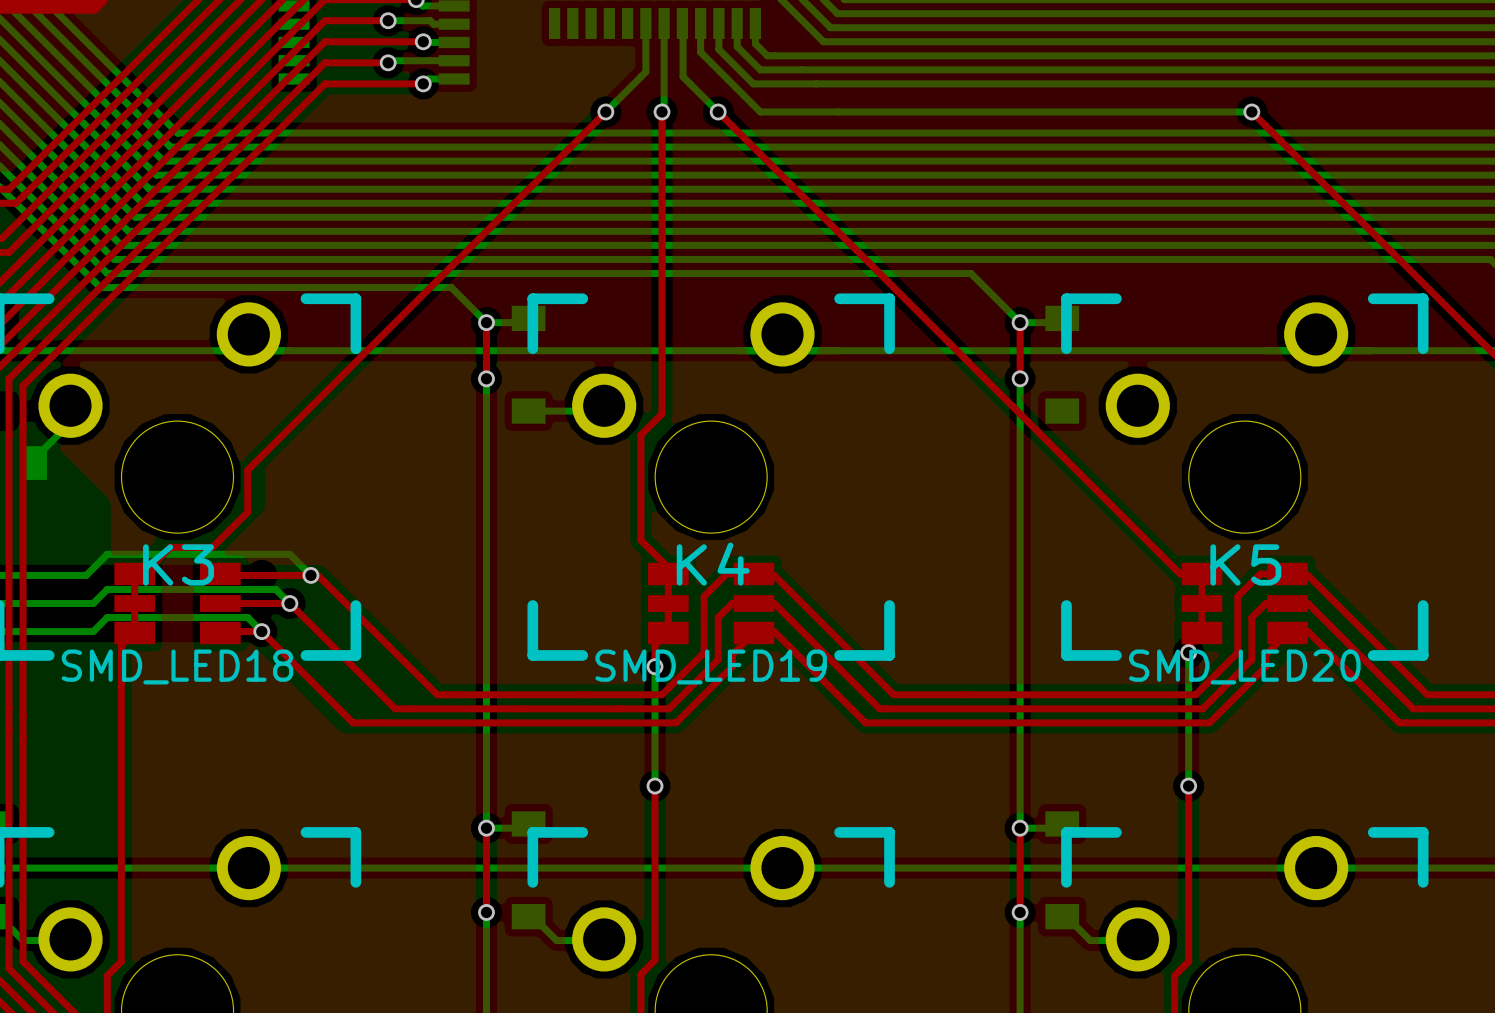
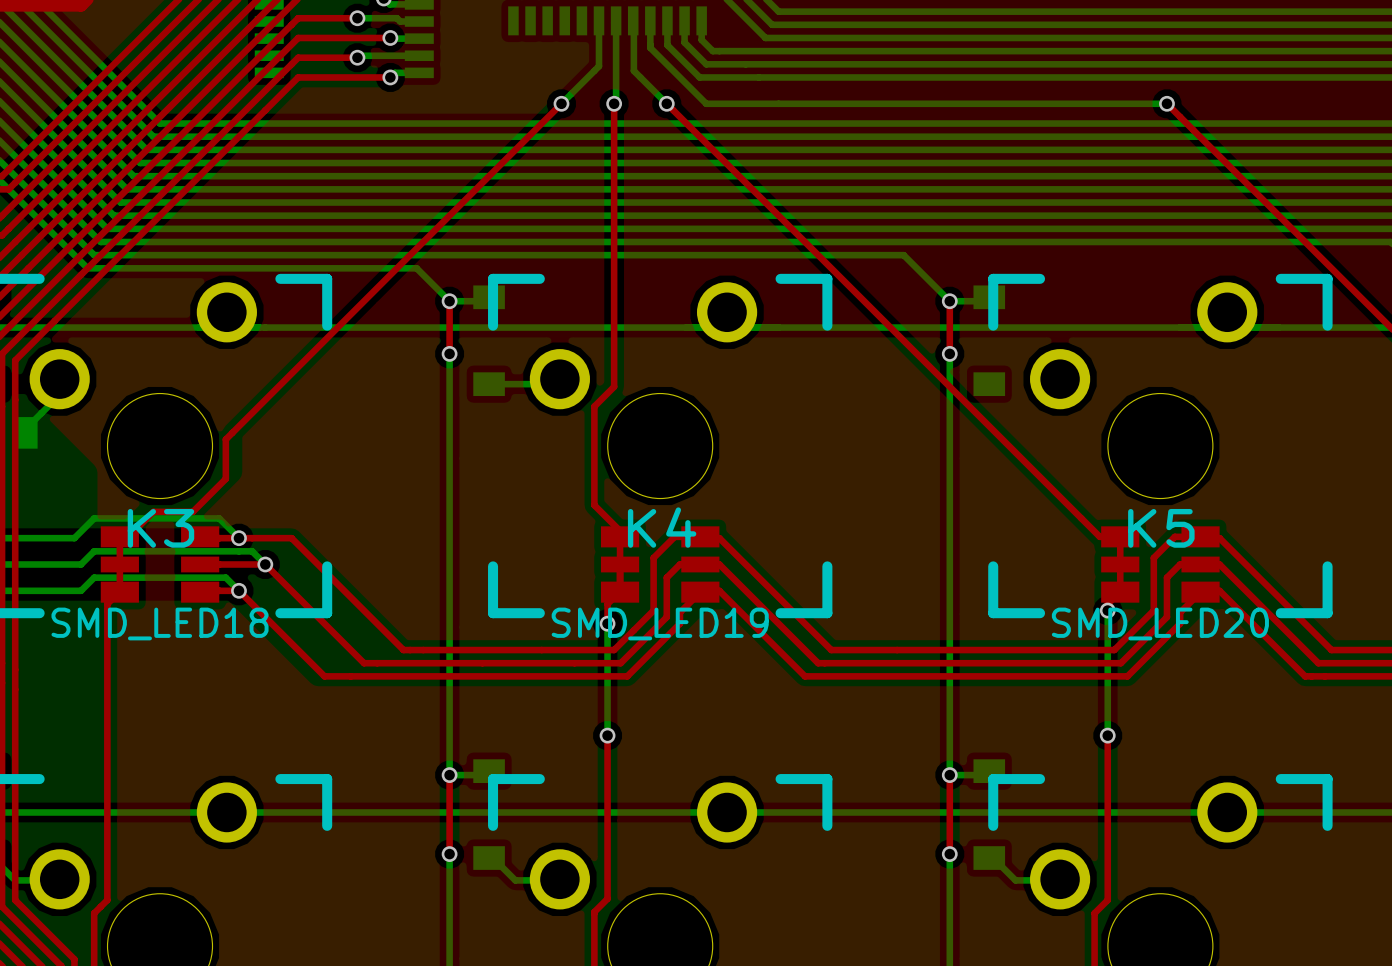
bottom track: (240, 554) (289, 554) (310, 575) -> (219, 518) (238, 538)
via position: (310, 575) -> (238, 538)

